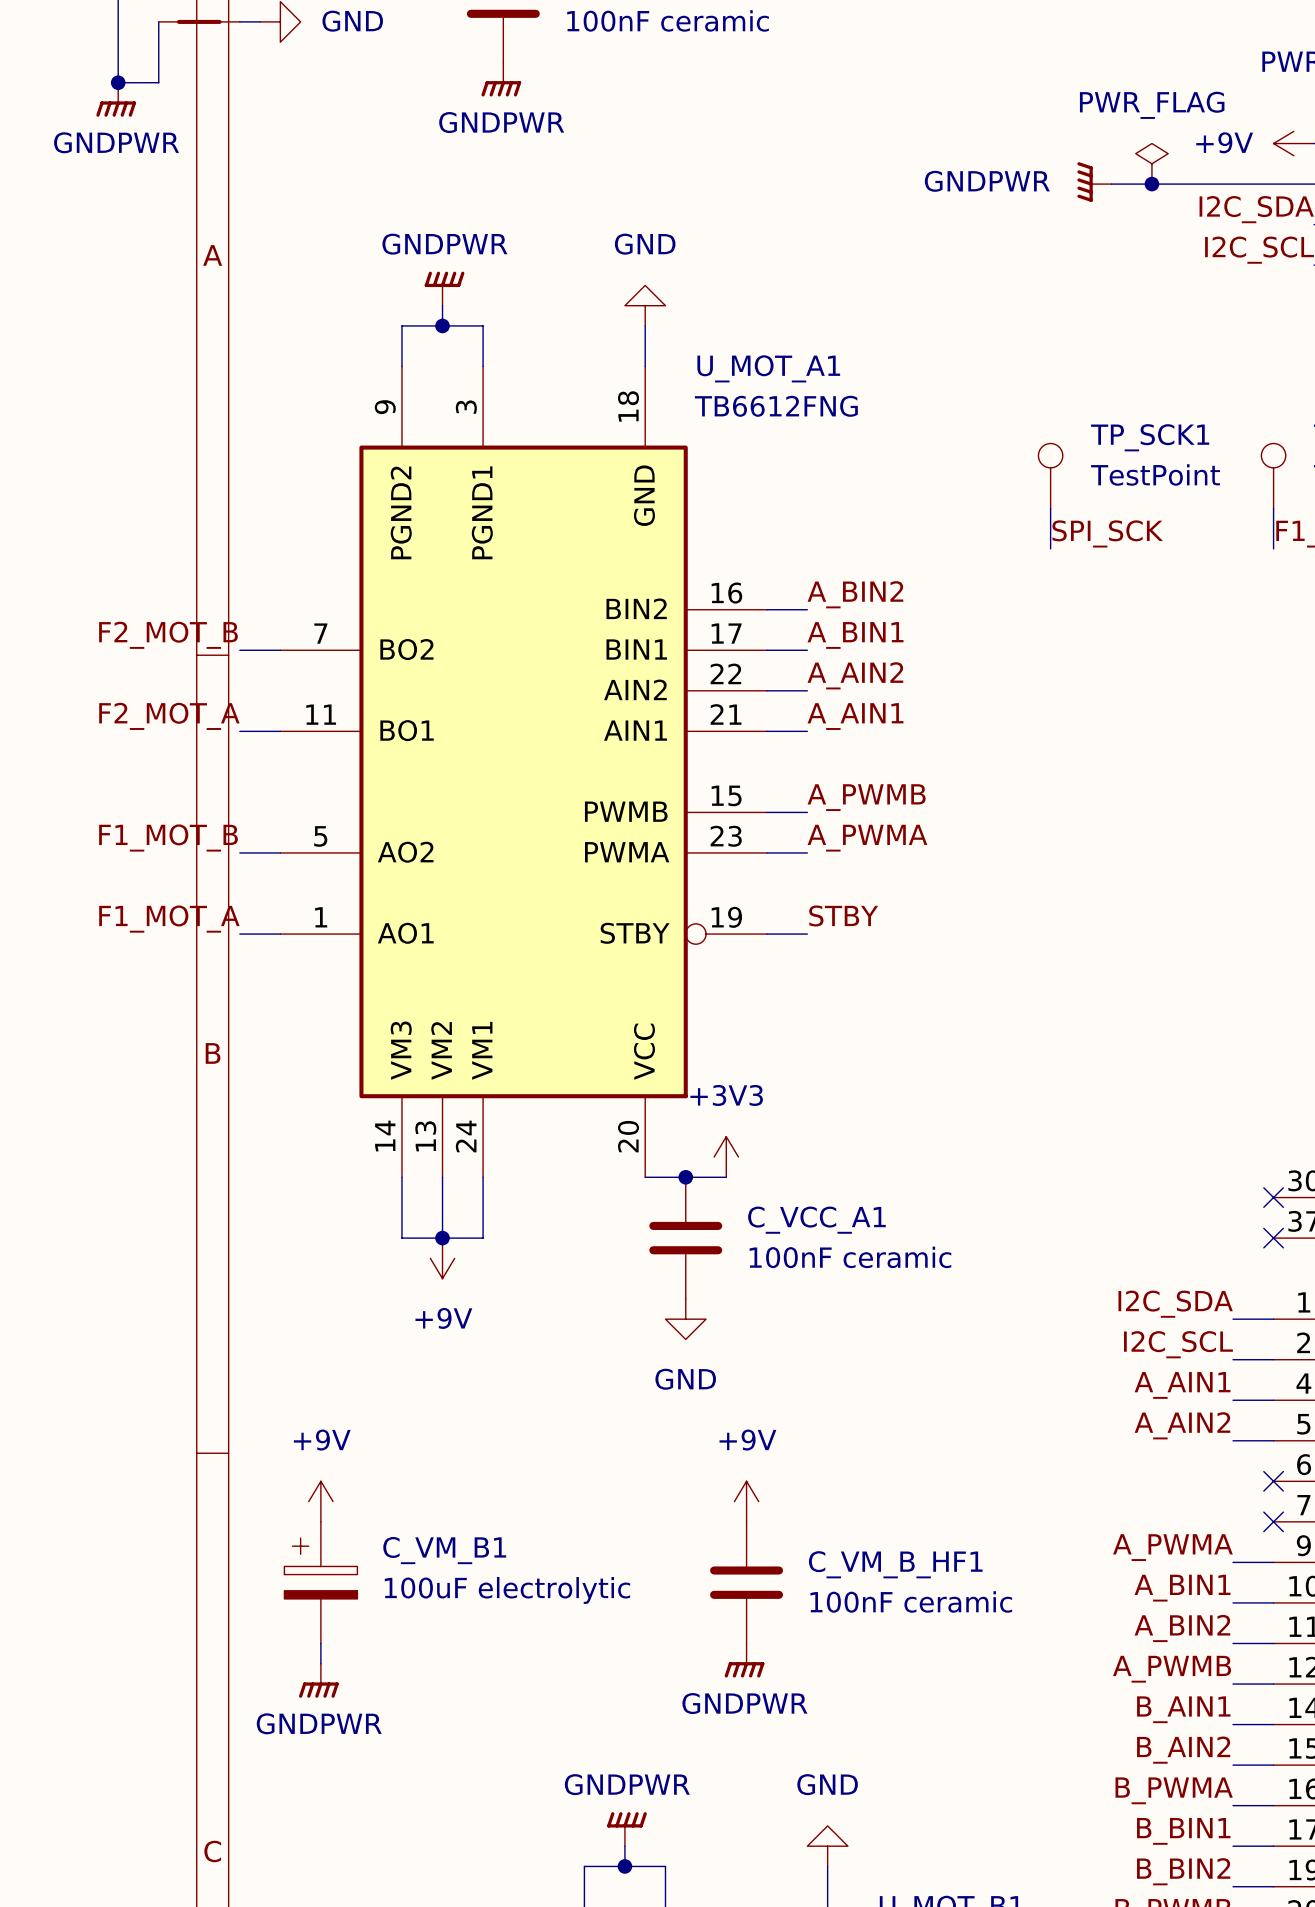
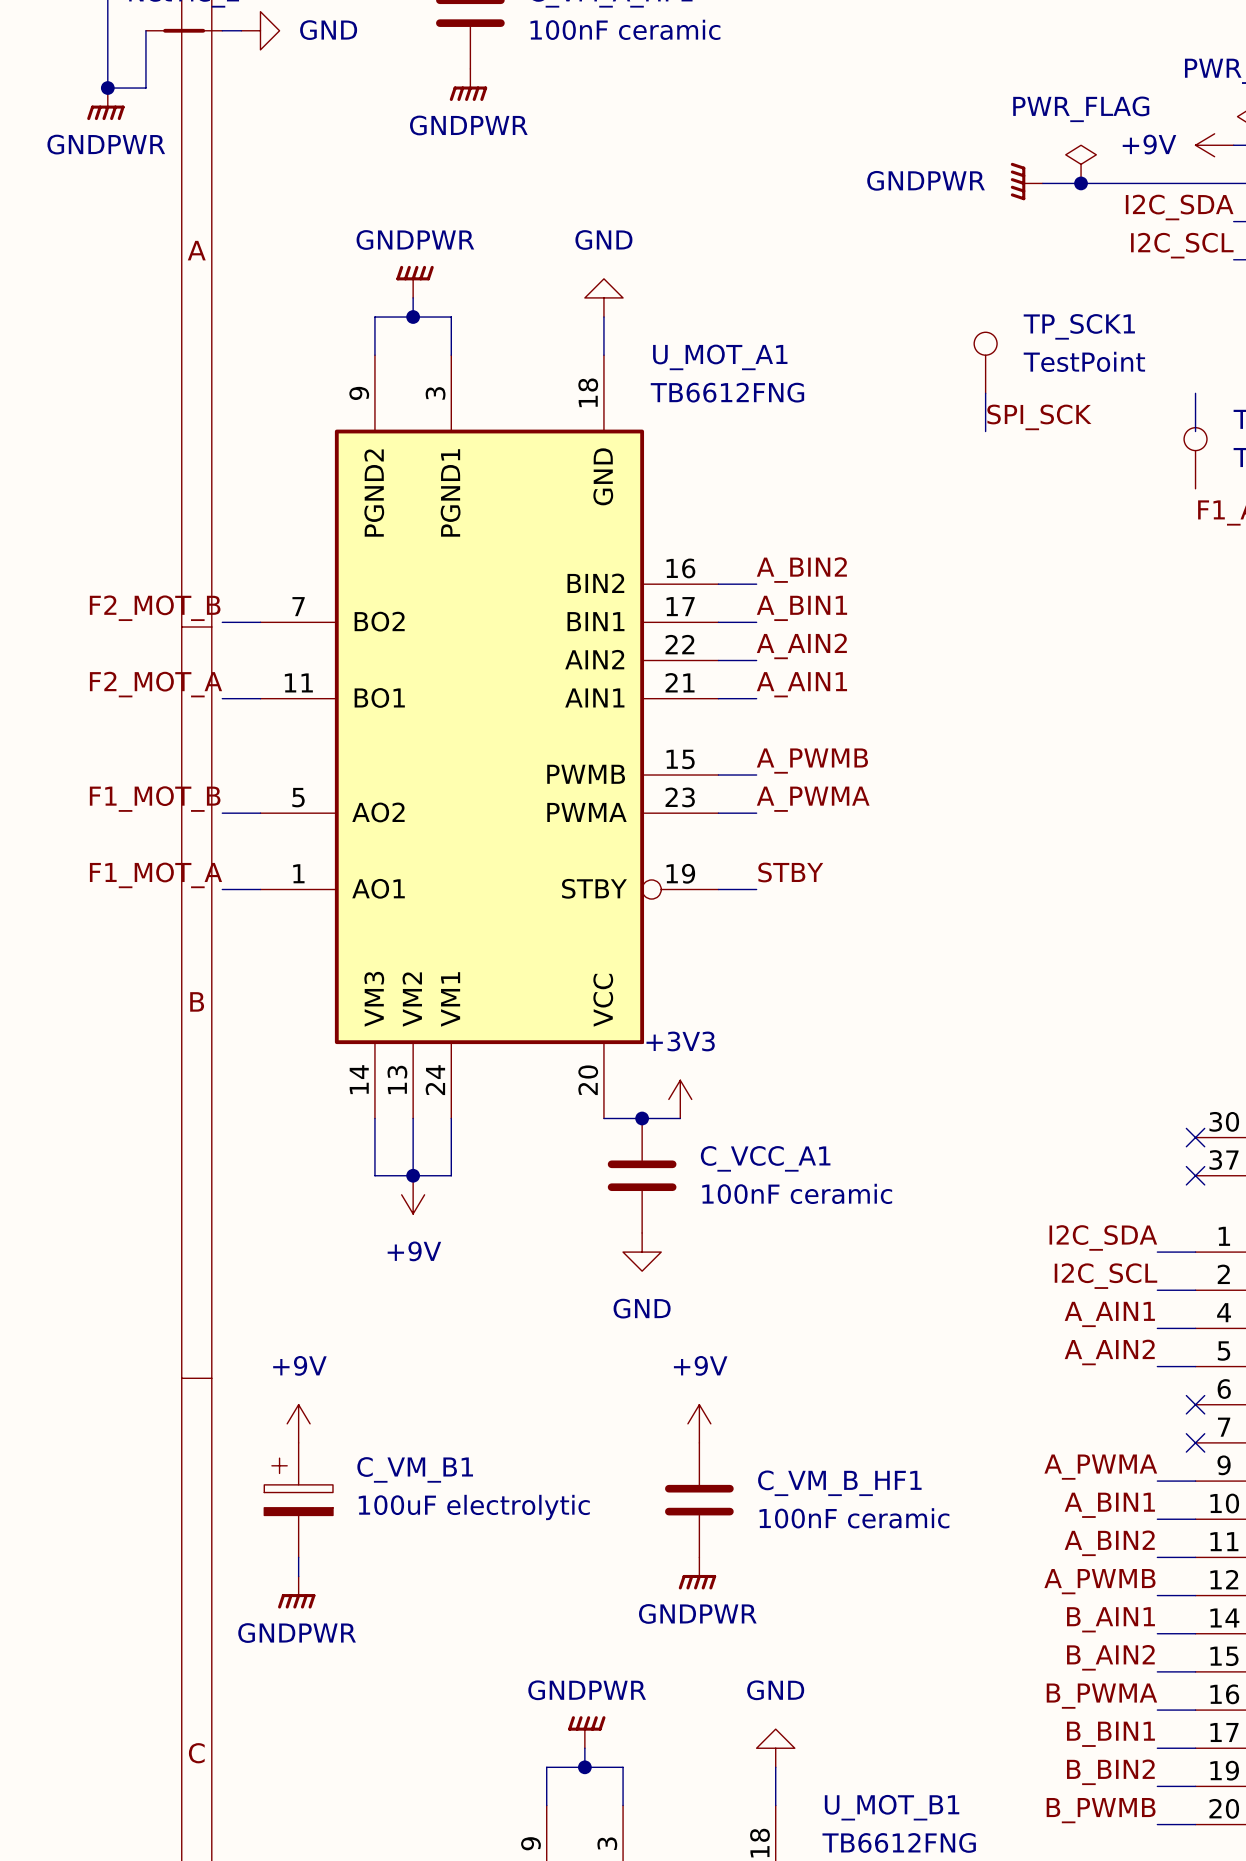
TP_SCK1 position: (1050, 475) -> (985, 362)
wire: (1050, 508) (1050, 548) -> (985, 393) (985, 431)
wire: (1273, 508) (1273, 548) -> (1195, 393) (1195, 431)
label position: SPI_SCK (1107, 533) -> SPI_SCK (1039, 417)

